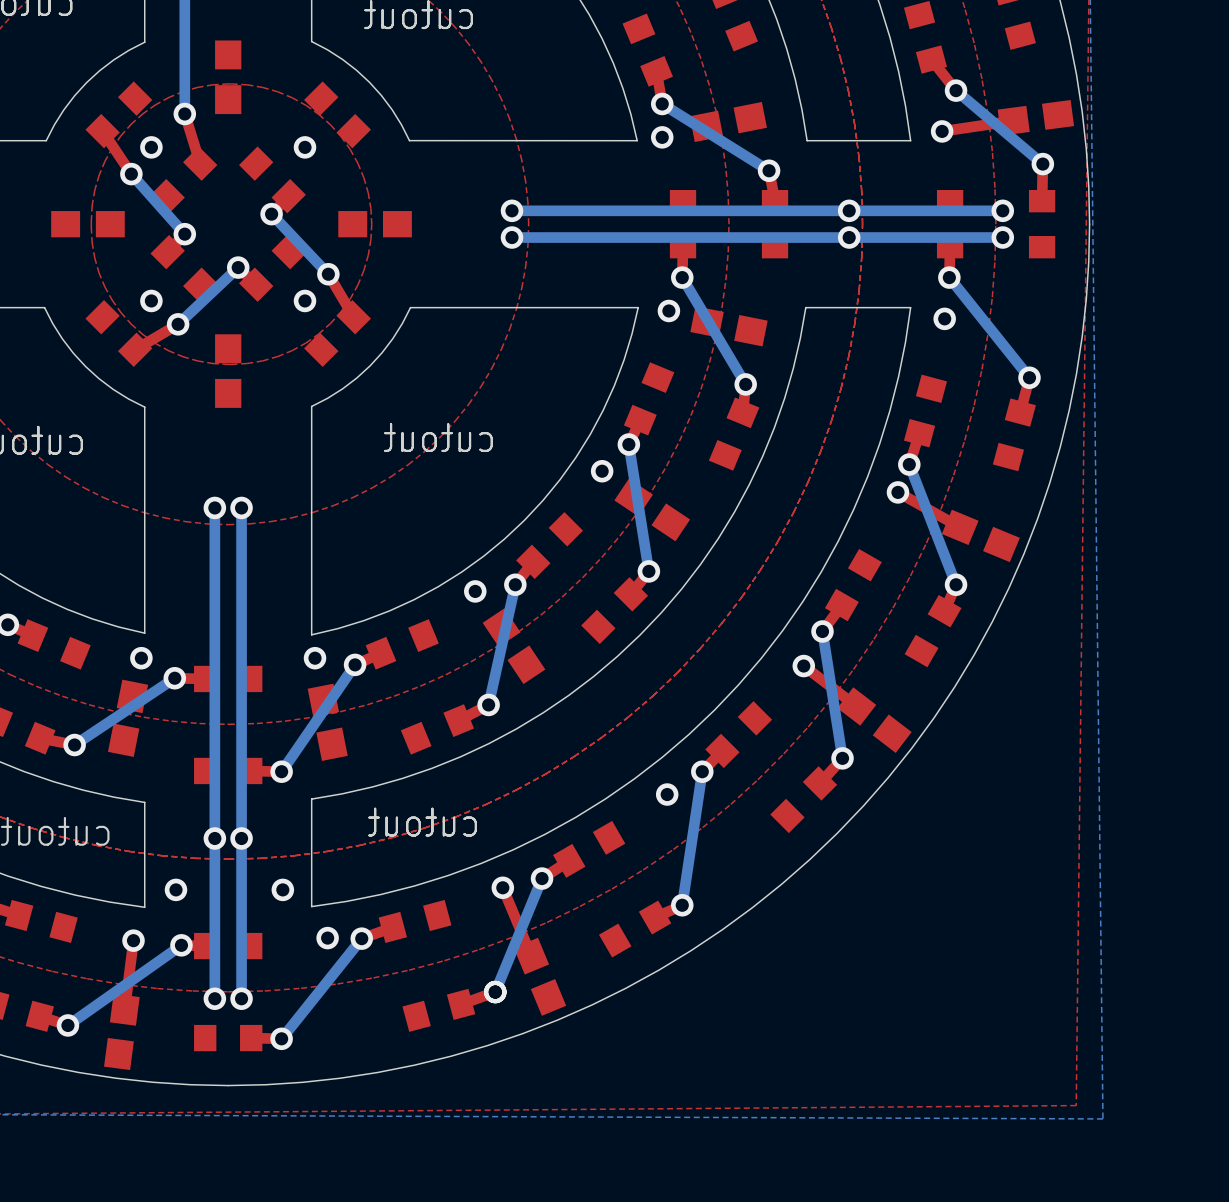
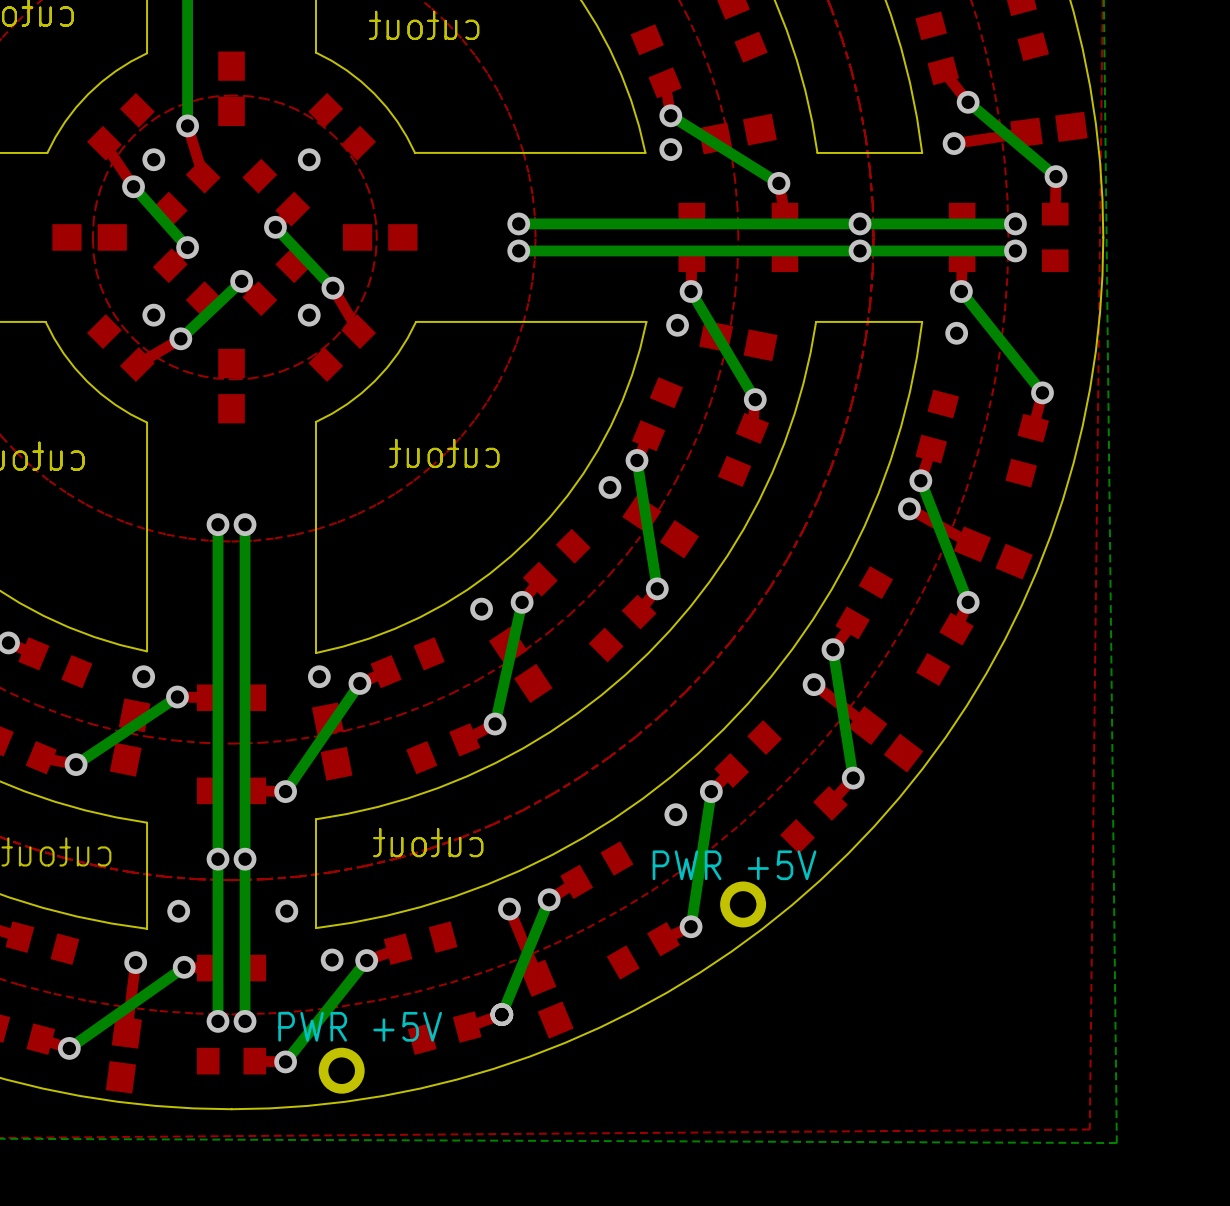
text: none -> PWR +5V (734, 865)
part: none -> (743, 904)
text: none -> PWR +5V (360, 1026)
part: none -> (341, 1070)

